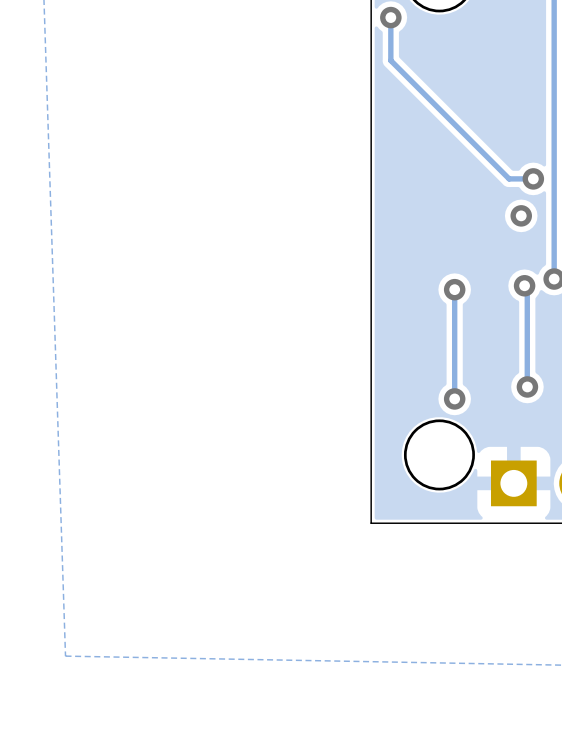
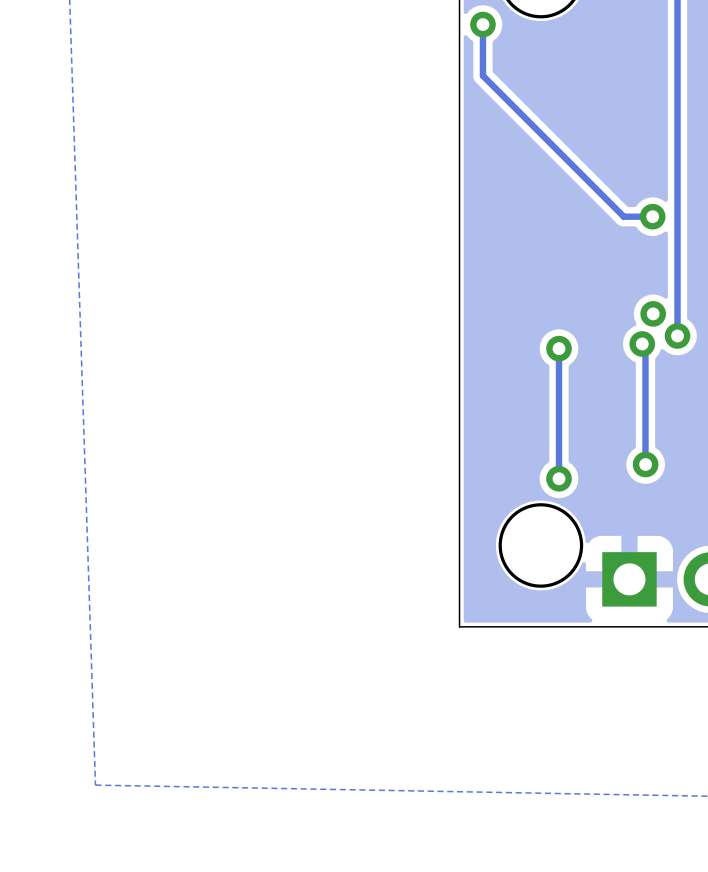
via: (521, 215) -> none
via: none -> (653, 313)

